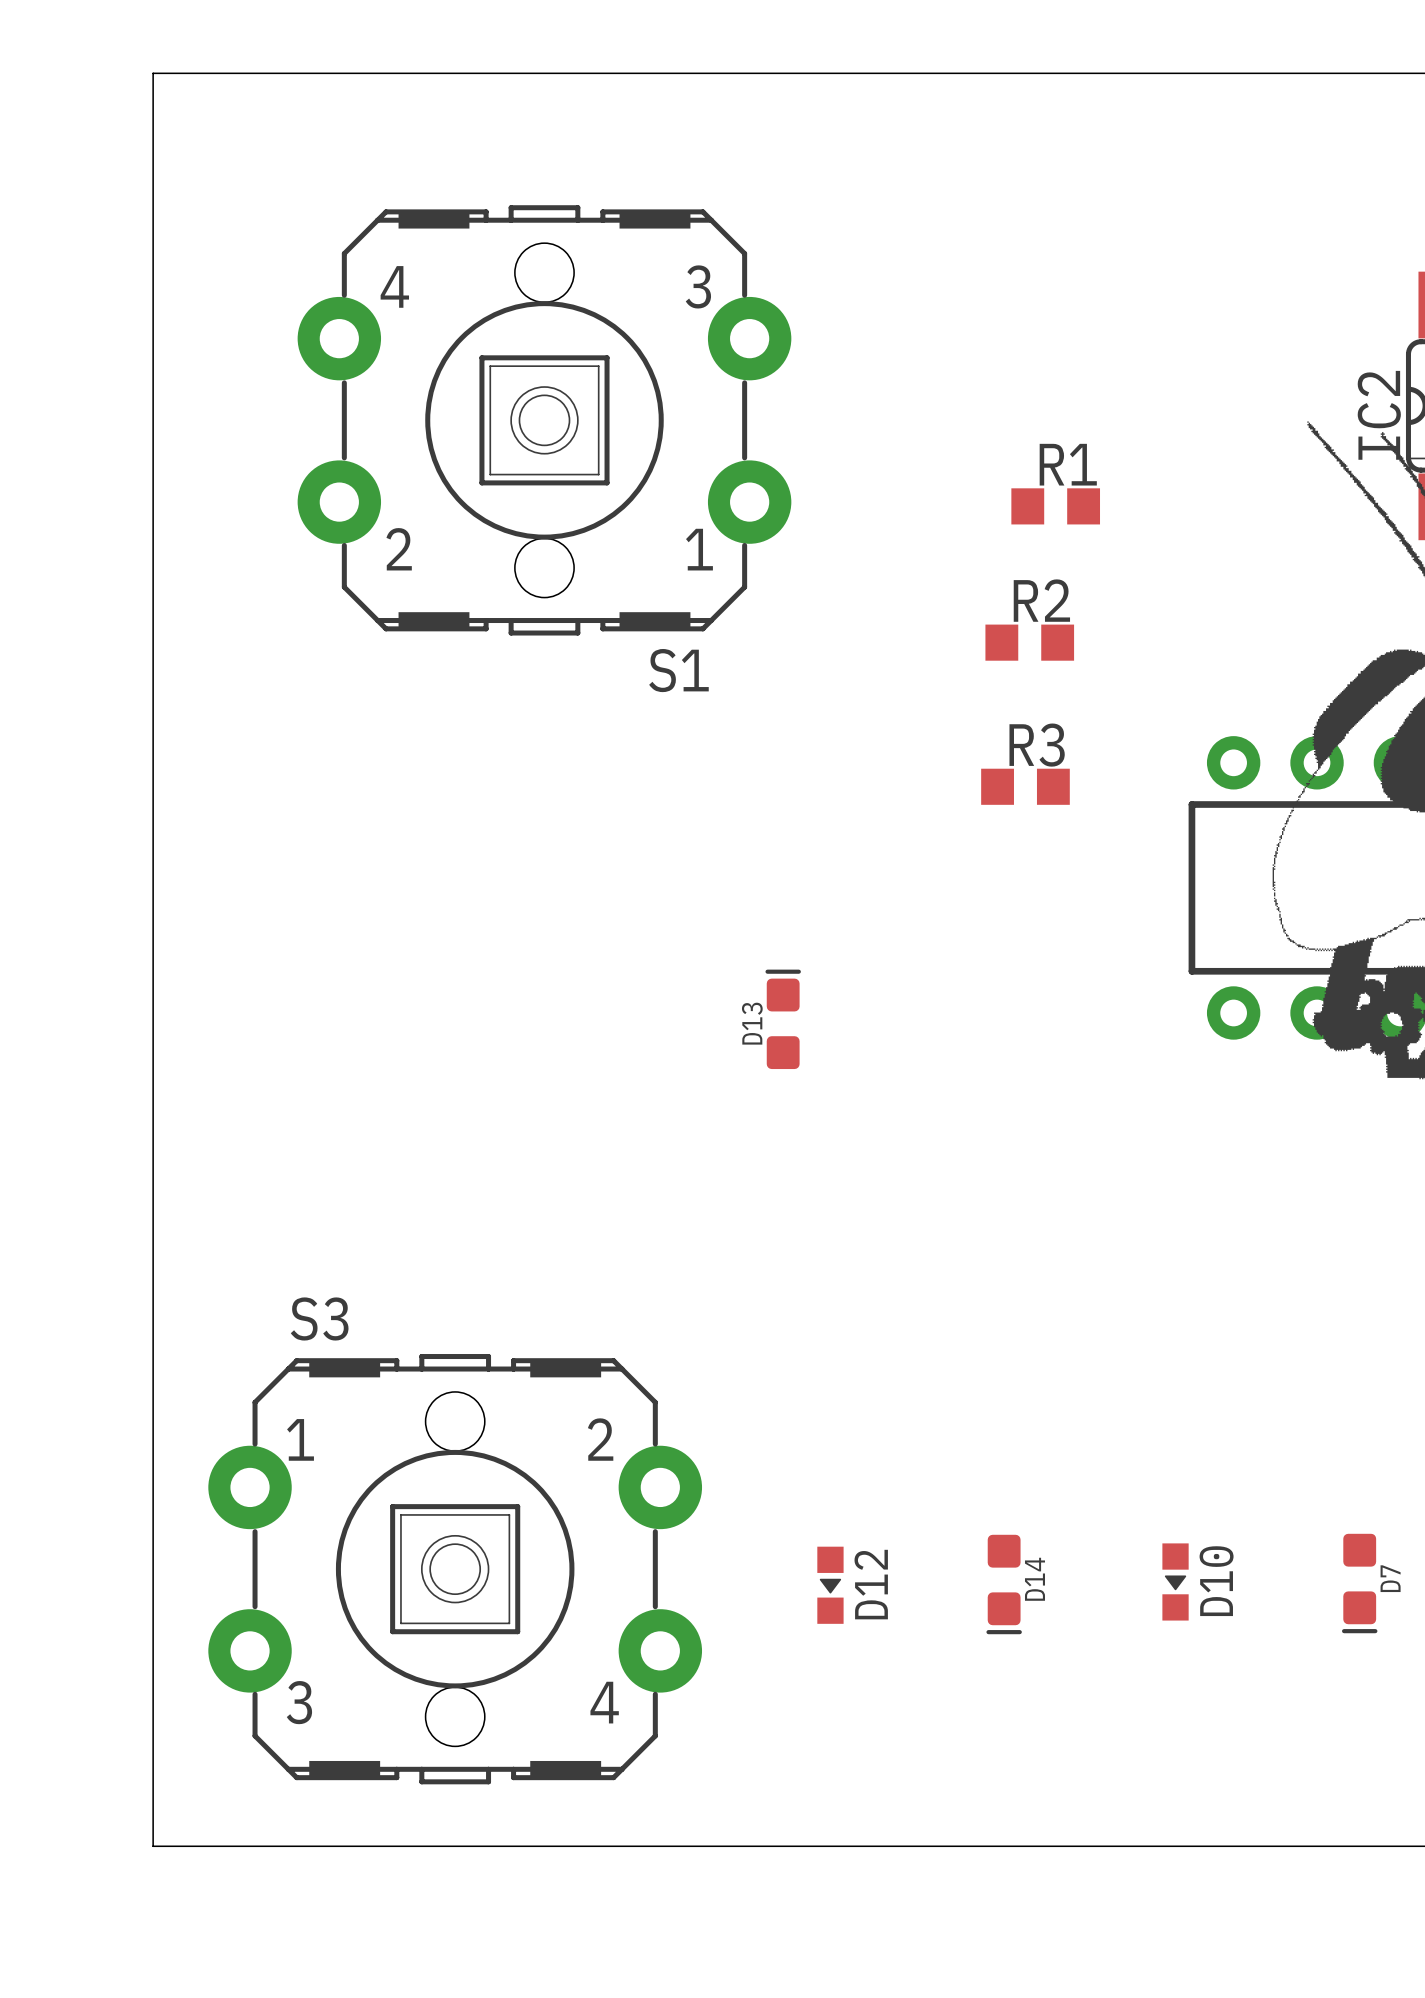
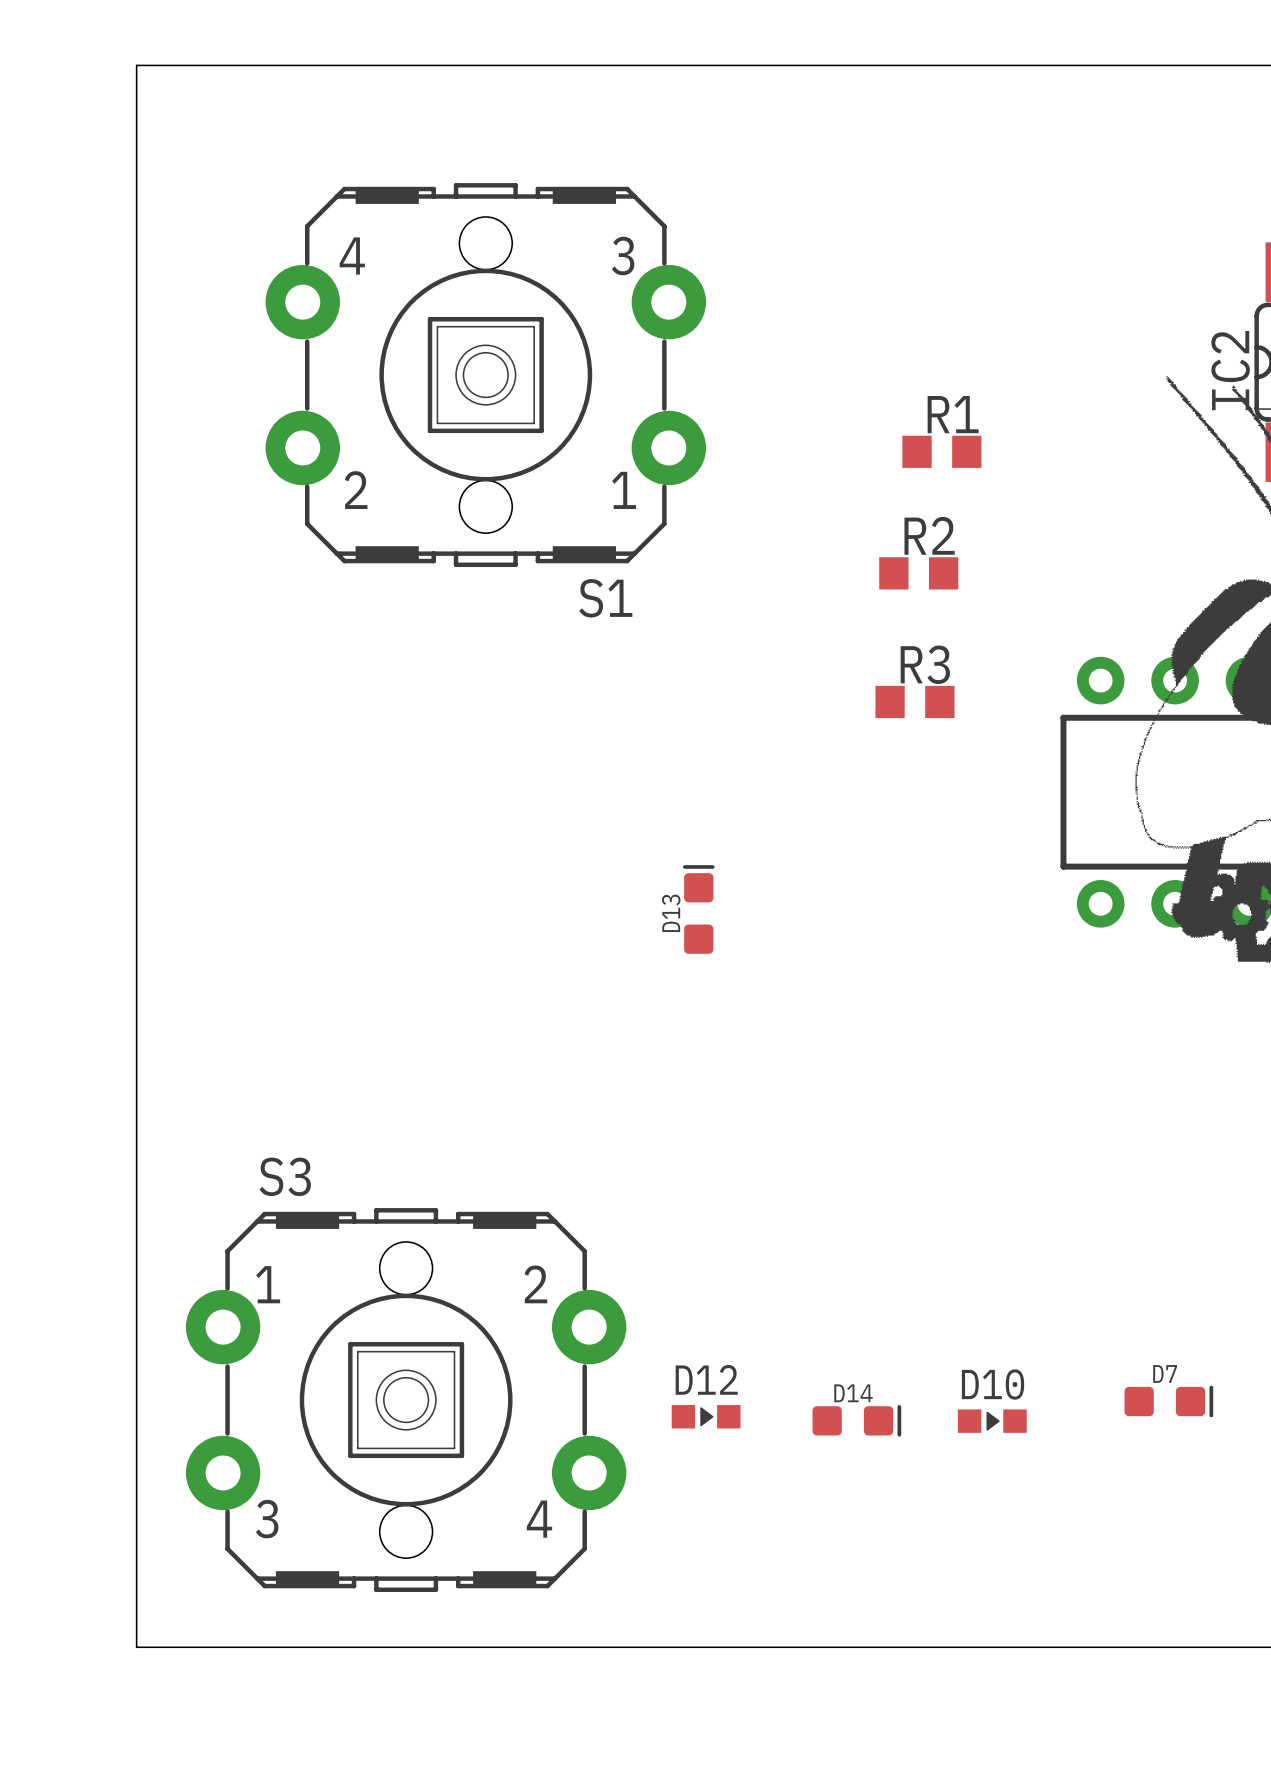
D10 rotation: 0° (1175, 1581) -> 90° counterclockwise (992, 1421)
D10 position: (1175, 1581) -> (992, 1421)
D7 rotation: 0° (1359, 1583) -> 90° counterclockwise (1168, 1401)
D14 rotation: 0° (1004, 1584) -> 90° counterclockwise (856, 1420)
D12 rotation: 0° (830, 1585) -> 90° counterclockwise (706, 1416)

